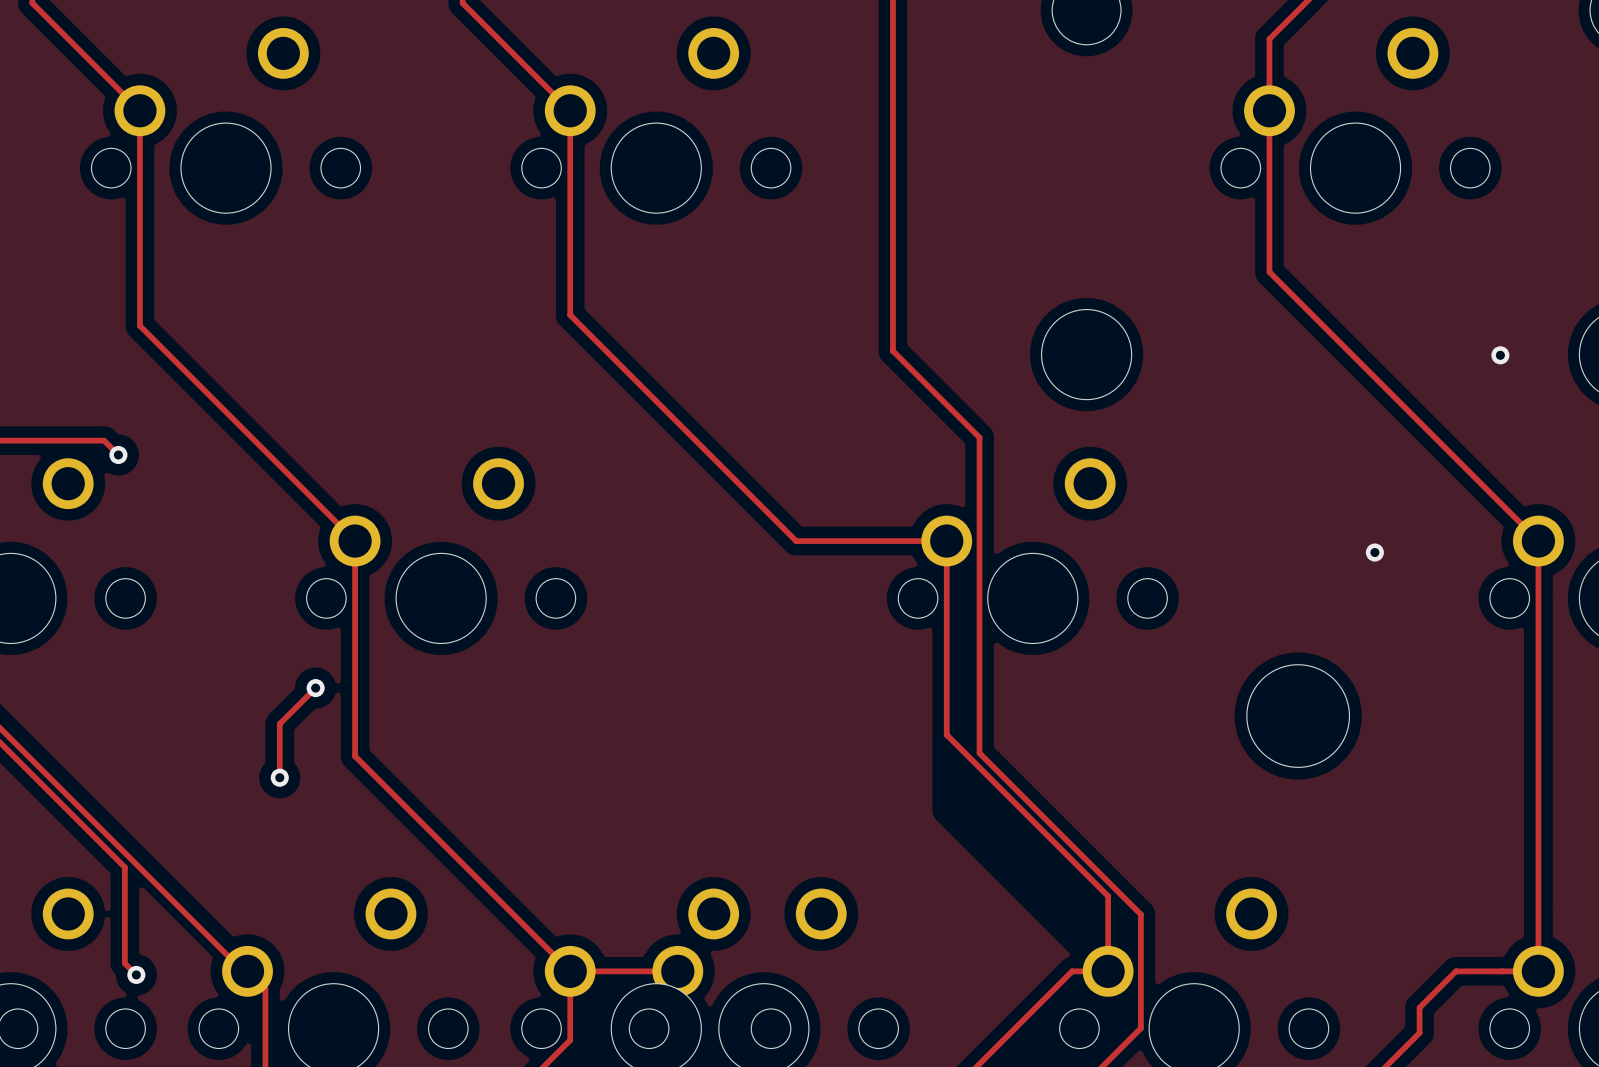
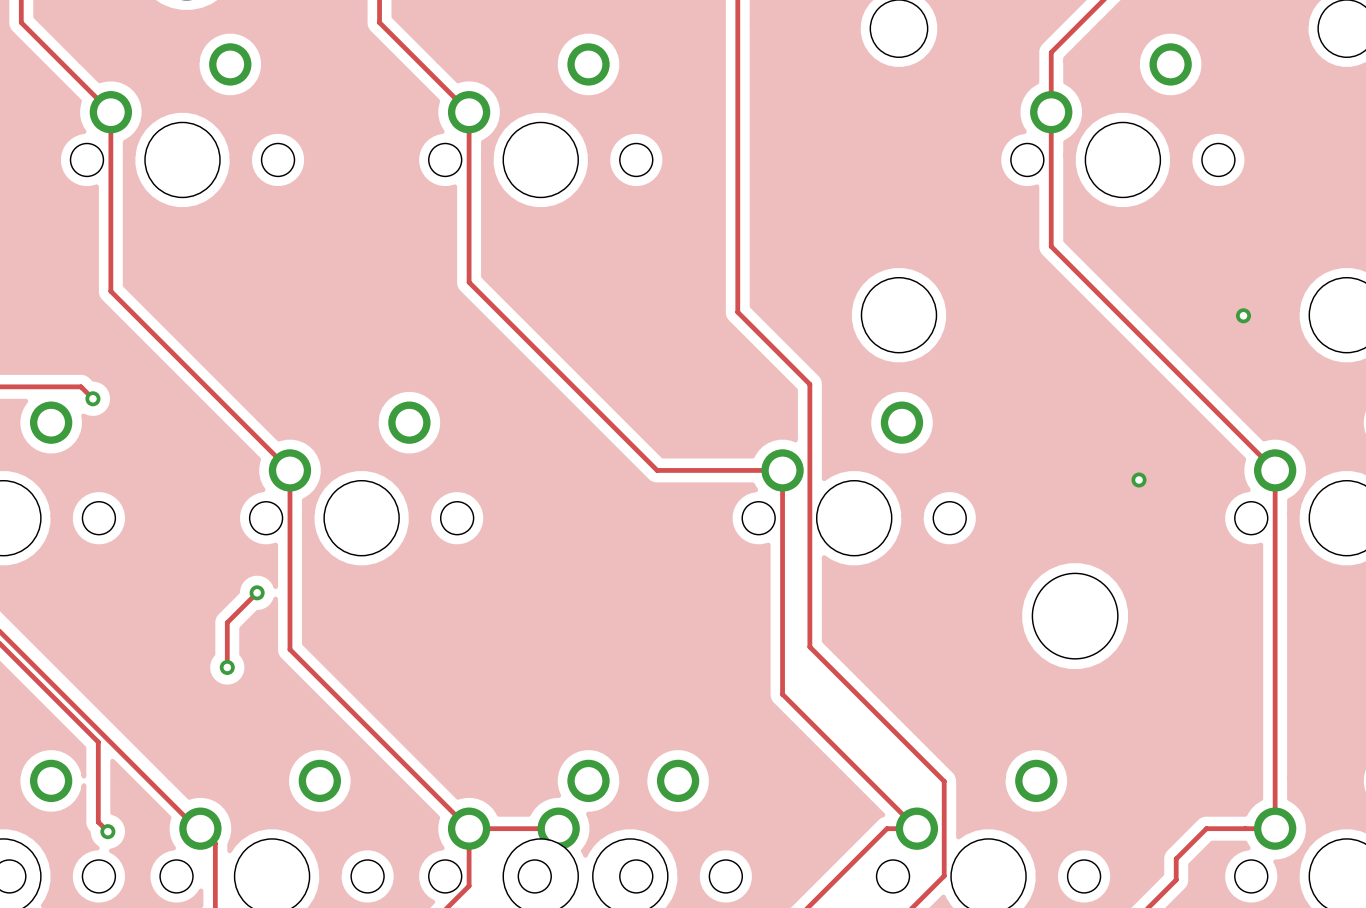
track: (946, 734) (1108, 896) (1108, 971) -> (782, 631) (782, 694) (916, 828)

